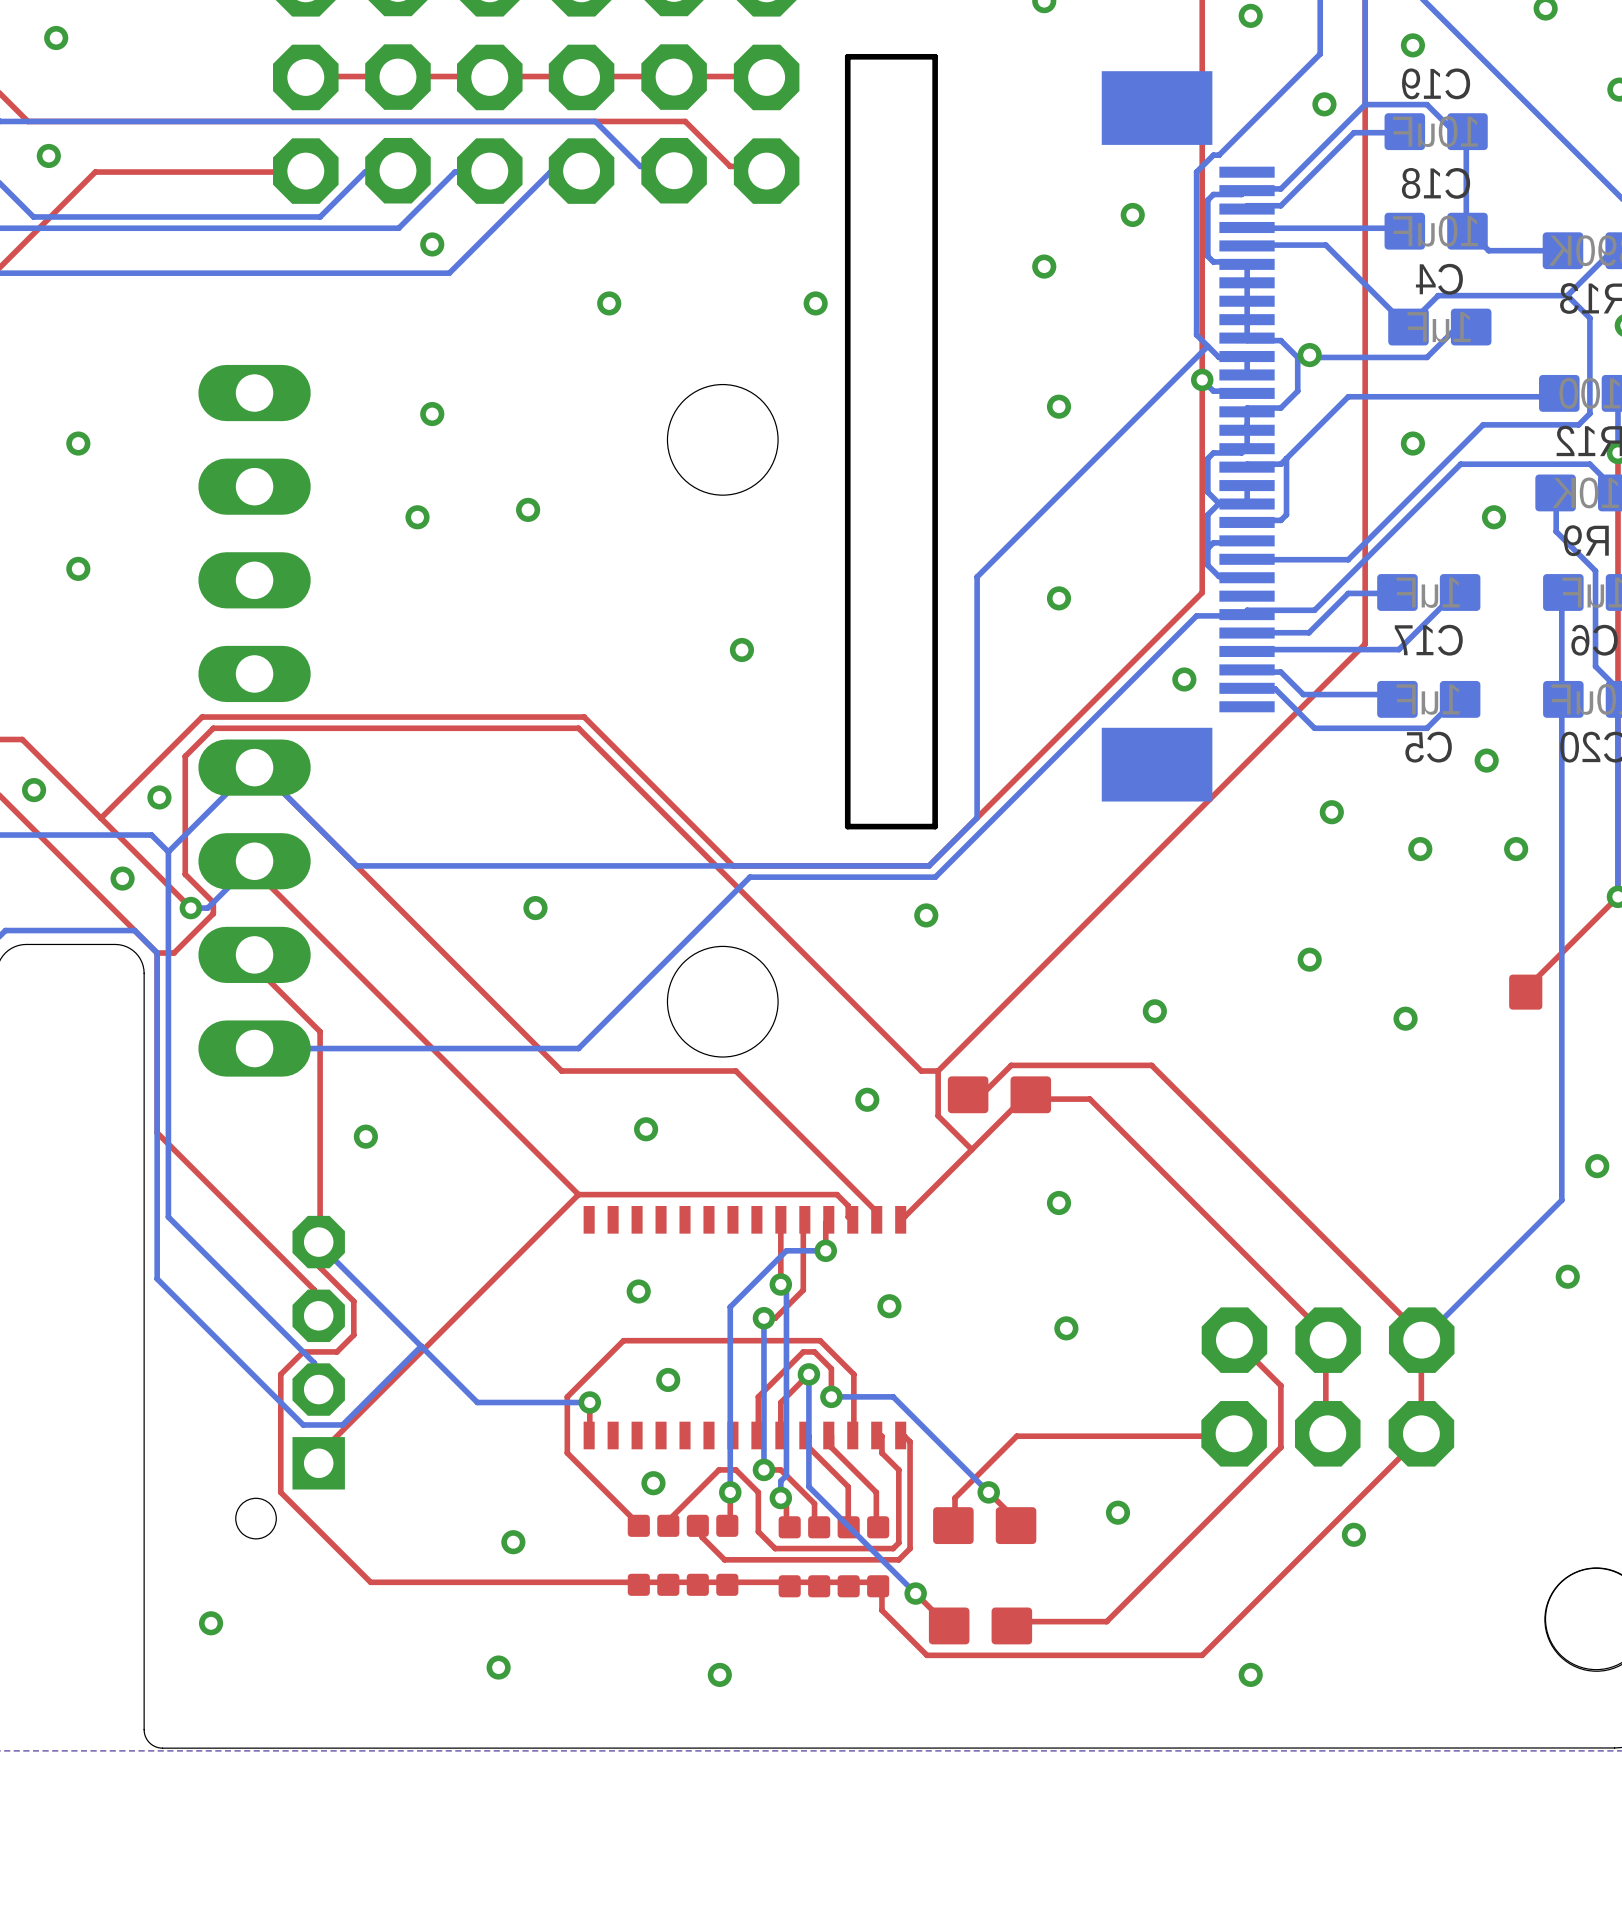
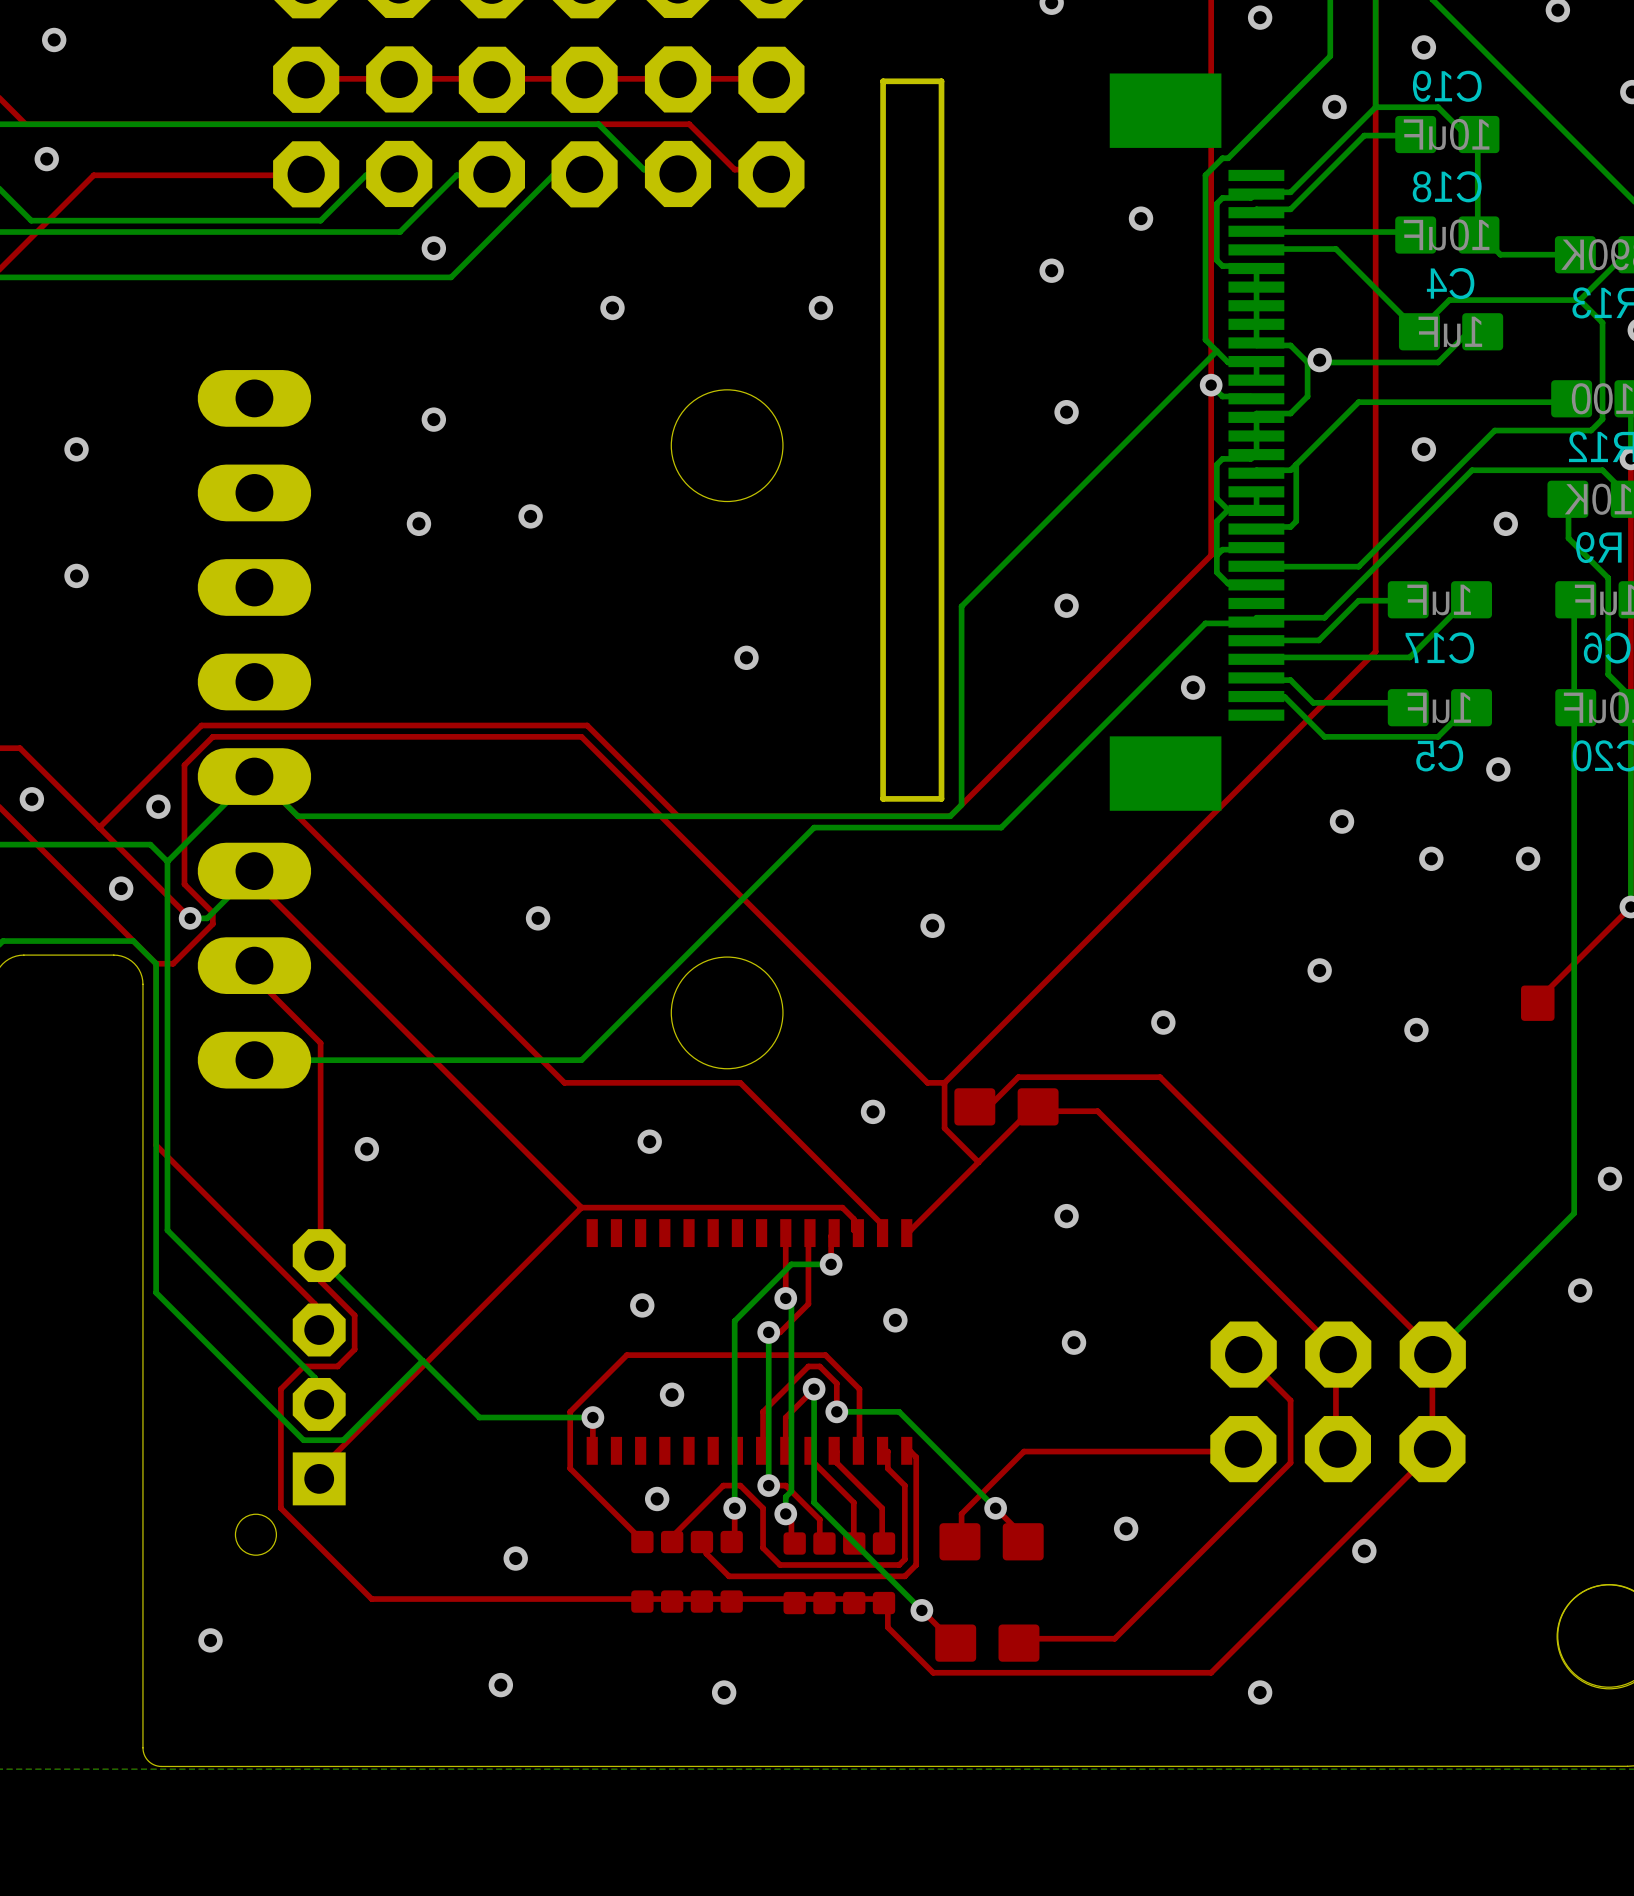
board edge: (935, 78) (935, 56) (847, 56) (847, 826) (935, 826) (935, 789) -> (941, 81) (883, 81) (883, 798) (941, 798)
top track: (1202, 548) (1202, 592) (929, 865) (733, 865) (674, 806) -> (1211, 555) (950, 816) (677, 816)
bottom track: (977, 576) (977, 817) (929, 865) (356, 865) (297, 806) -> (983, 584) (961, 606) (961, 804) (950, 816) (297, 816)
bottom track: (994, 818) (935, 877) (749, 877) -> (1001, 827) (814, 827) (754, 887)

